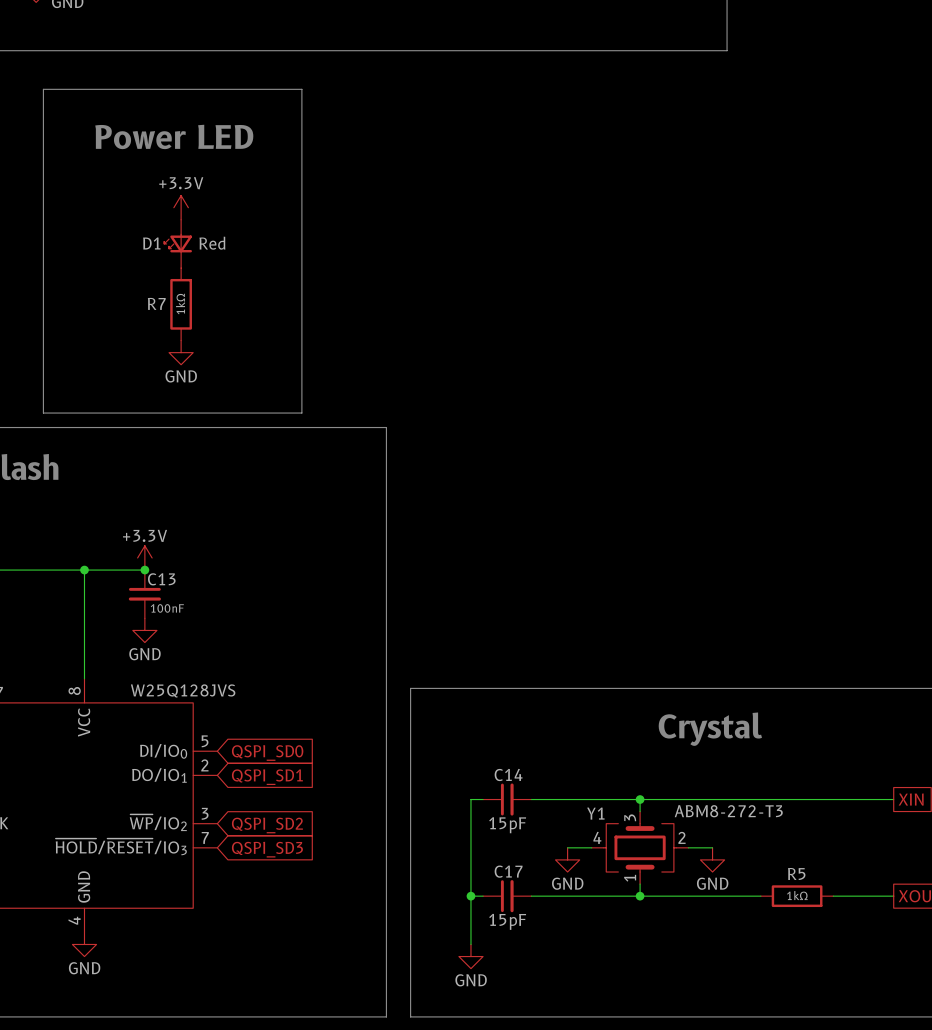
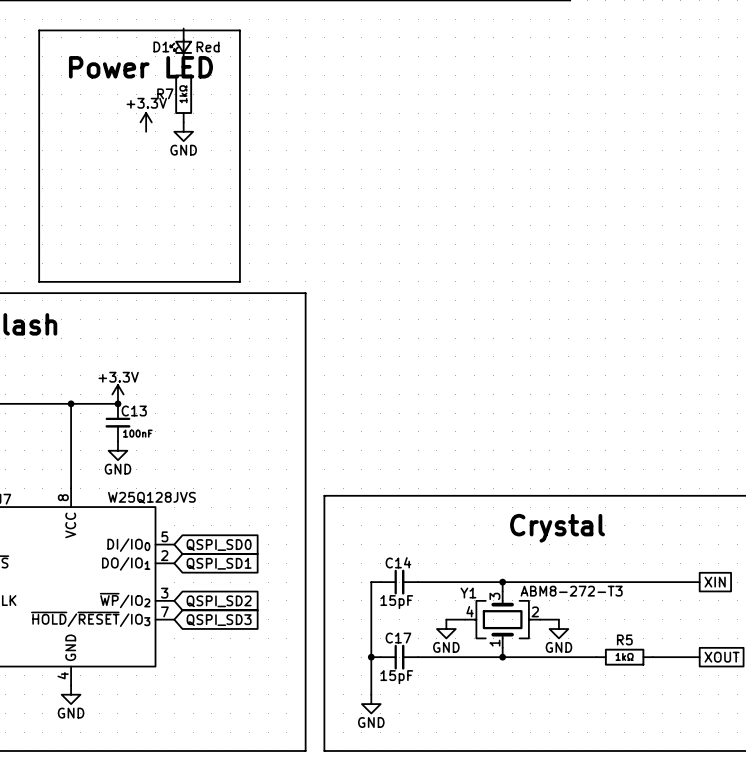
D1 position: (178, 243) -> (181, 47)
R7 position: (181, 304) -> (183, 94)
power symbol position: GND (181, 352) -> GND (183, 131)

